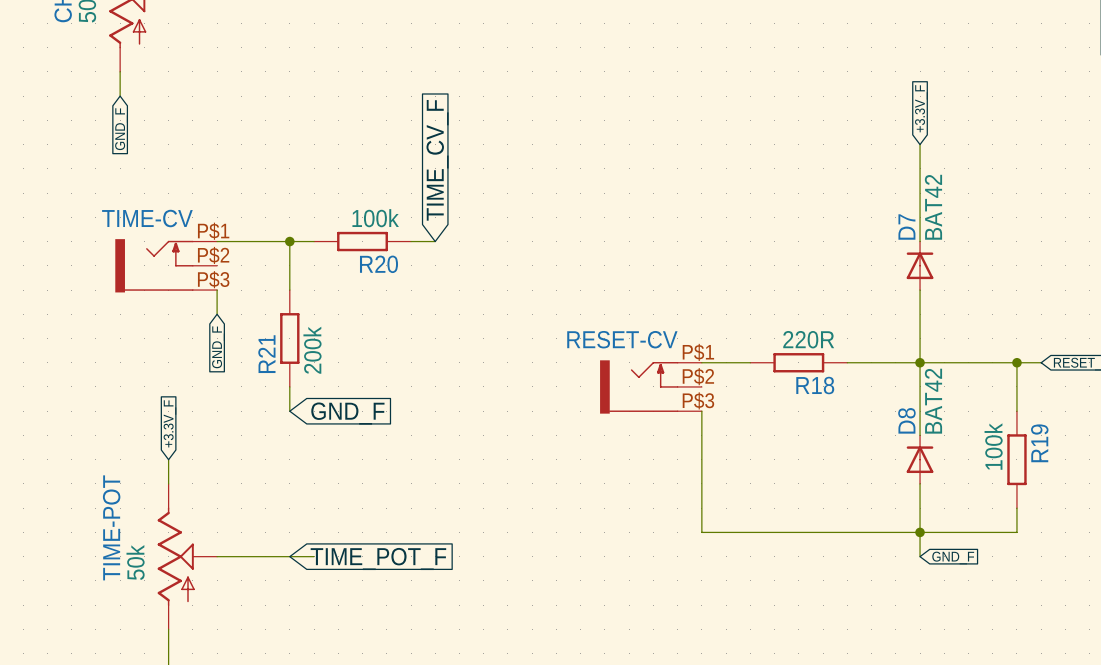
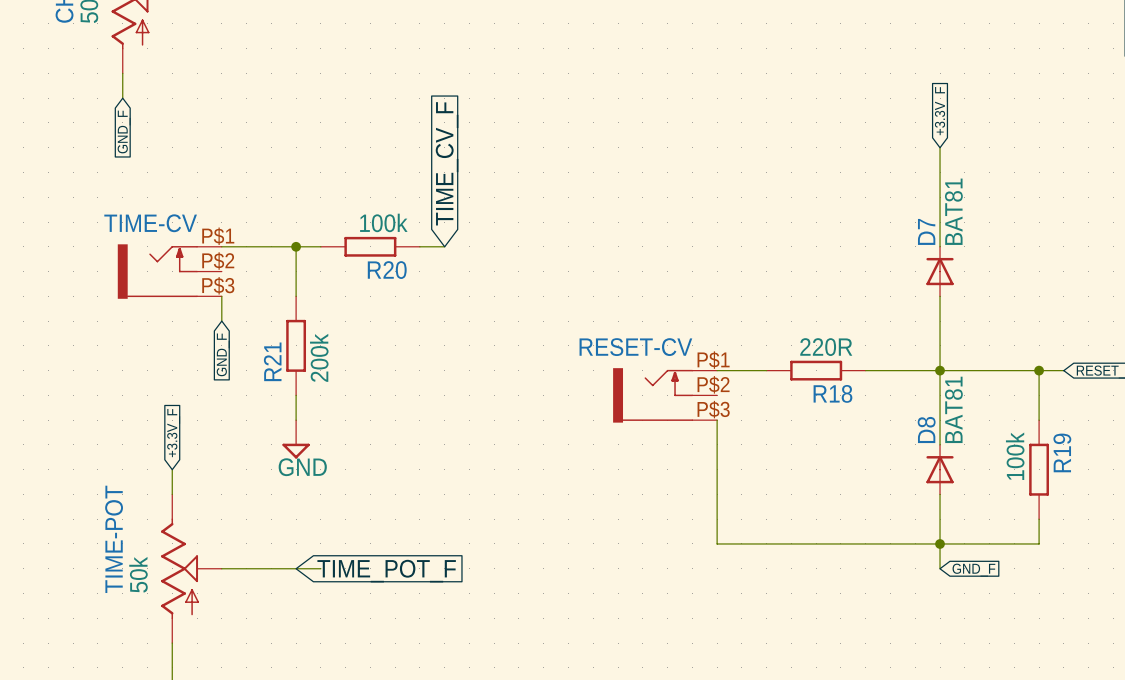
D7 value: BAT42 (933, 207) -> BAT81 (953, 211)
D8 value: BAT42 (933, 401) -> BAT81 (953, 409)
global label: GND_F (347, 413) -> none
power symbol: none -> GND (296, 439)

